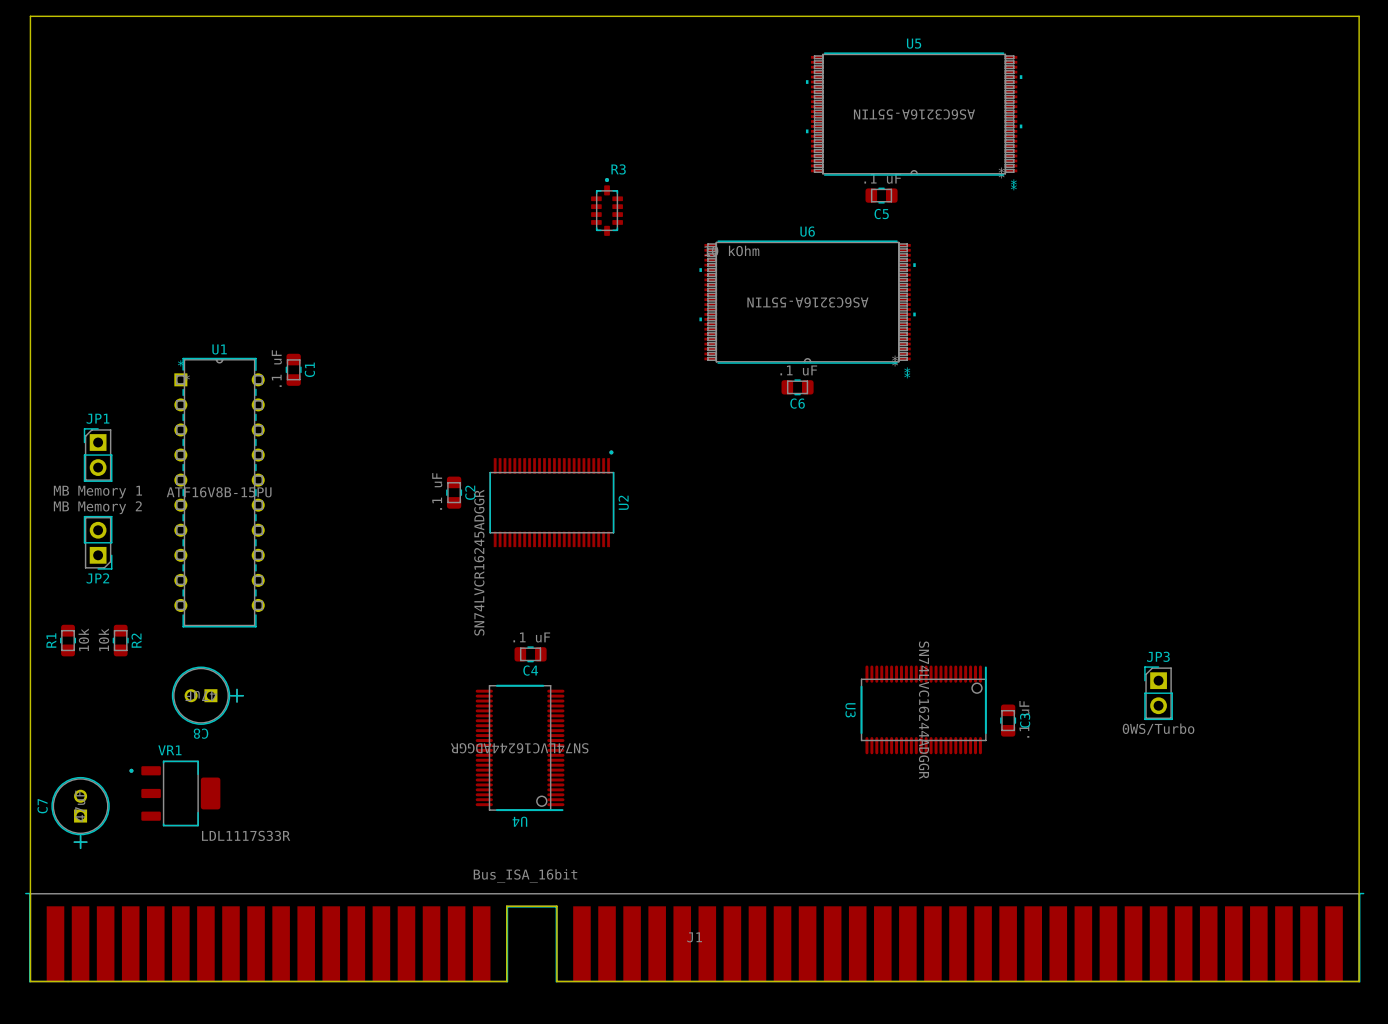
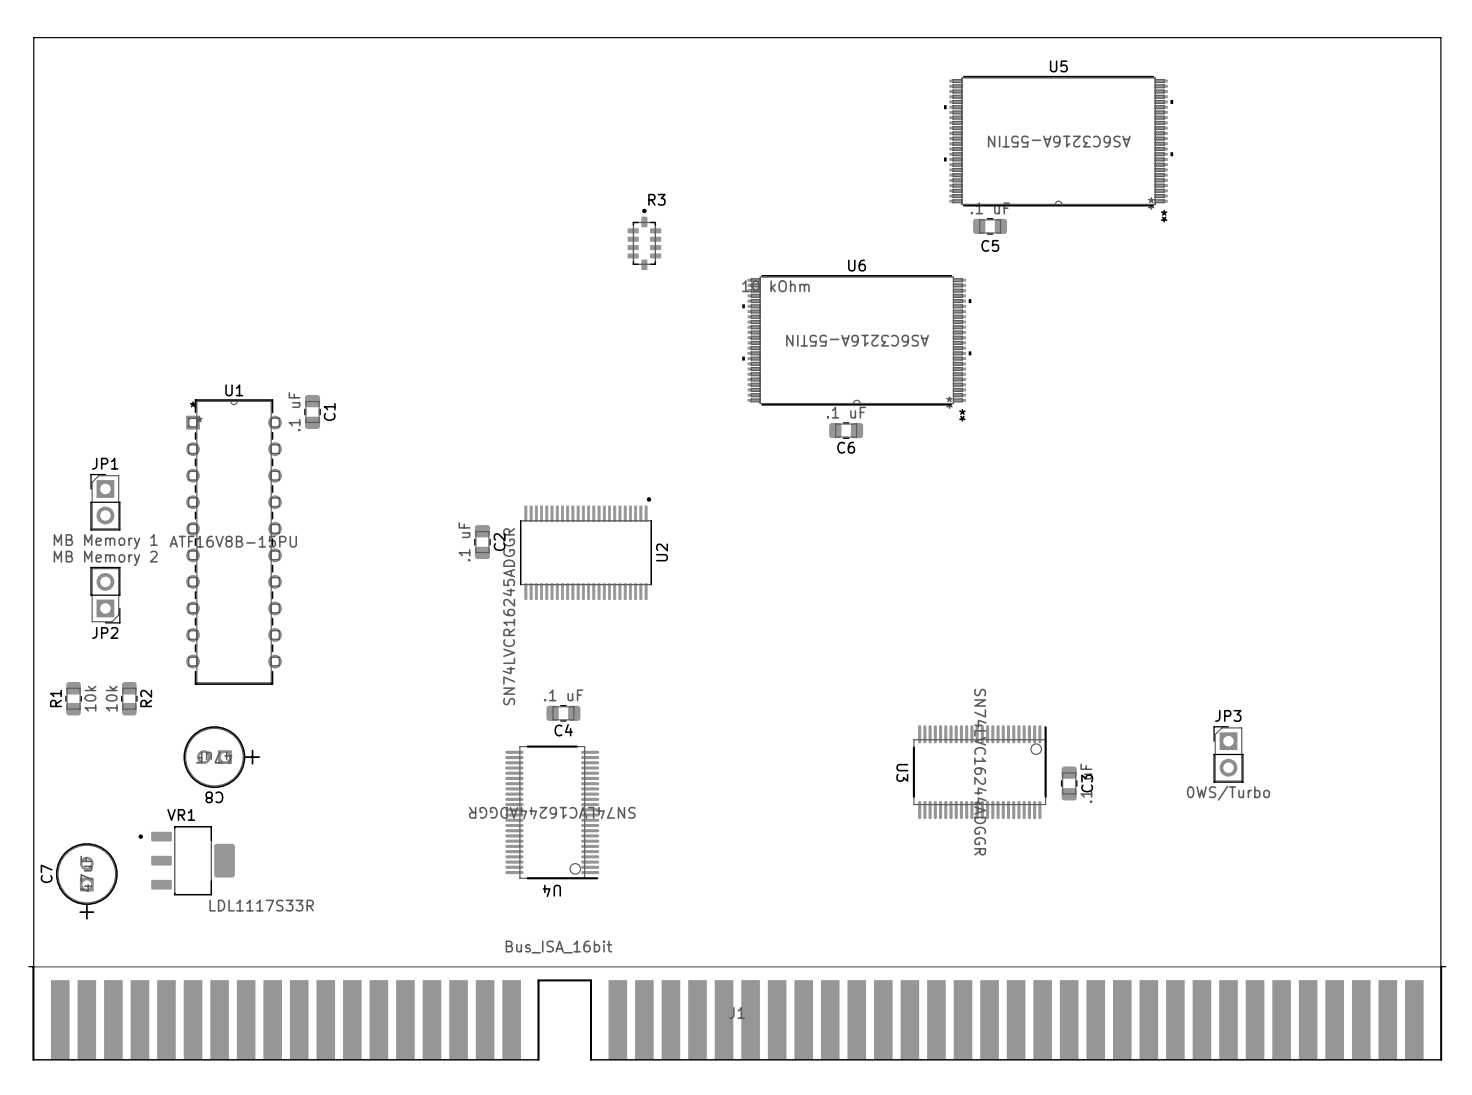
U5 position: (914, 114) -> (1058, 141)
C5 position: (881, 195) -> (990, 226)

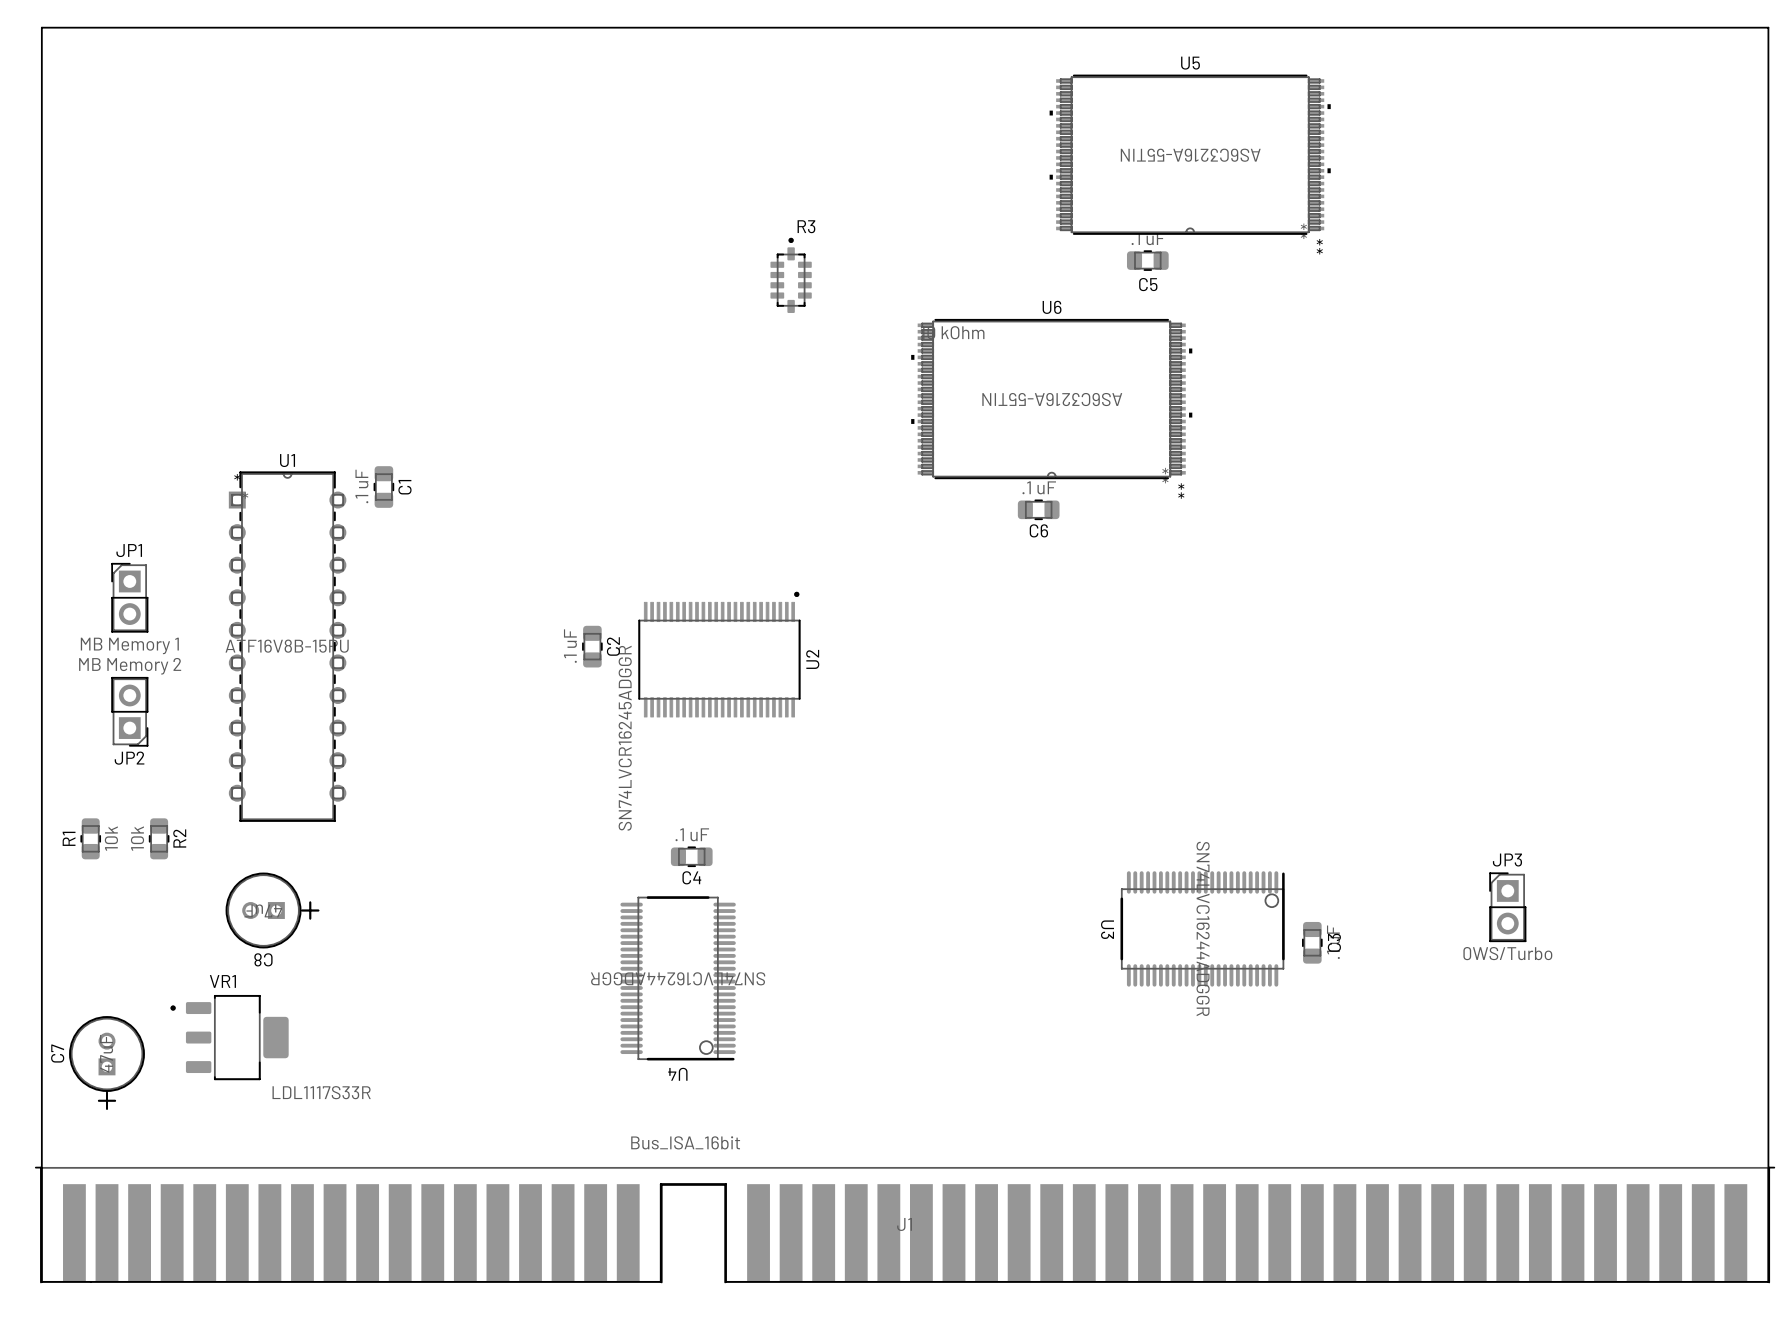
U5 position: (1058, 141) -> (1190, 154)
C5 position: (990, 226) -> (1147, 260)

